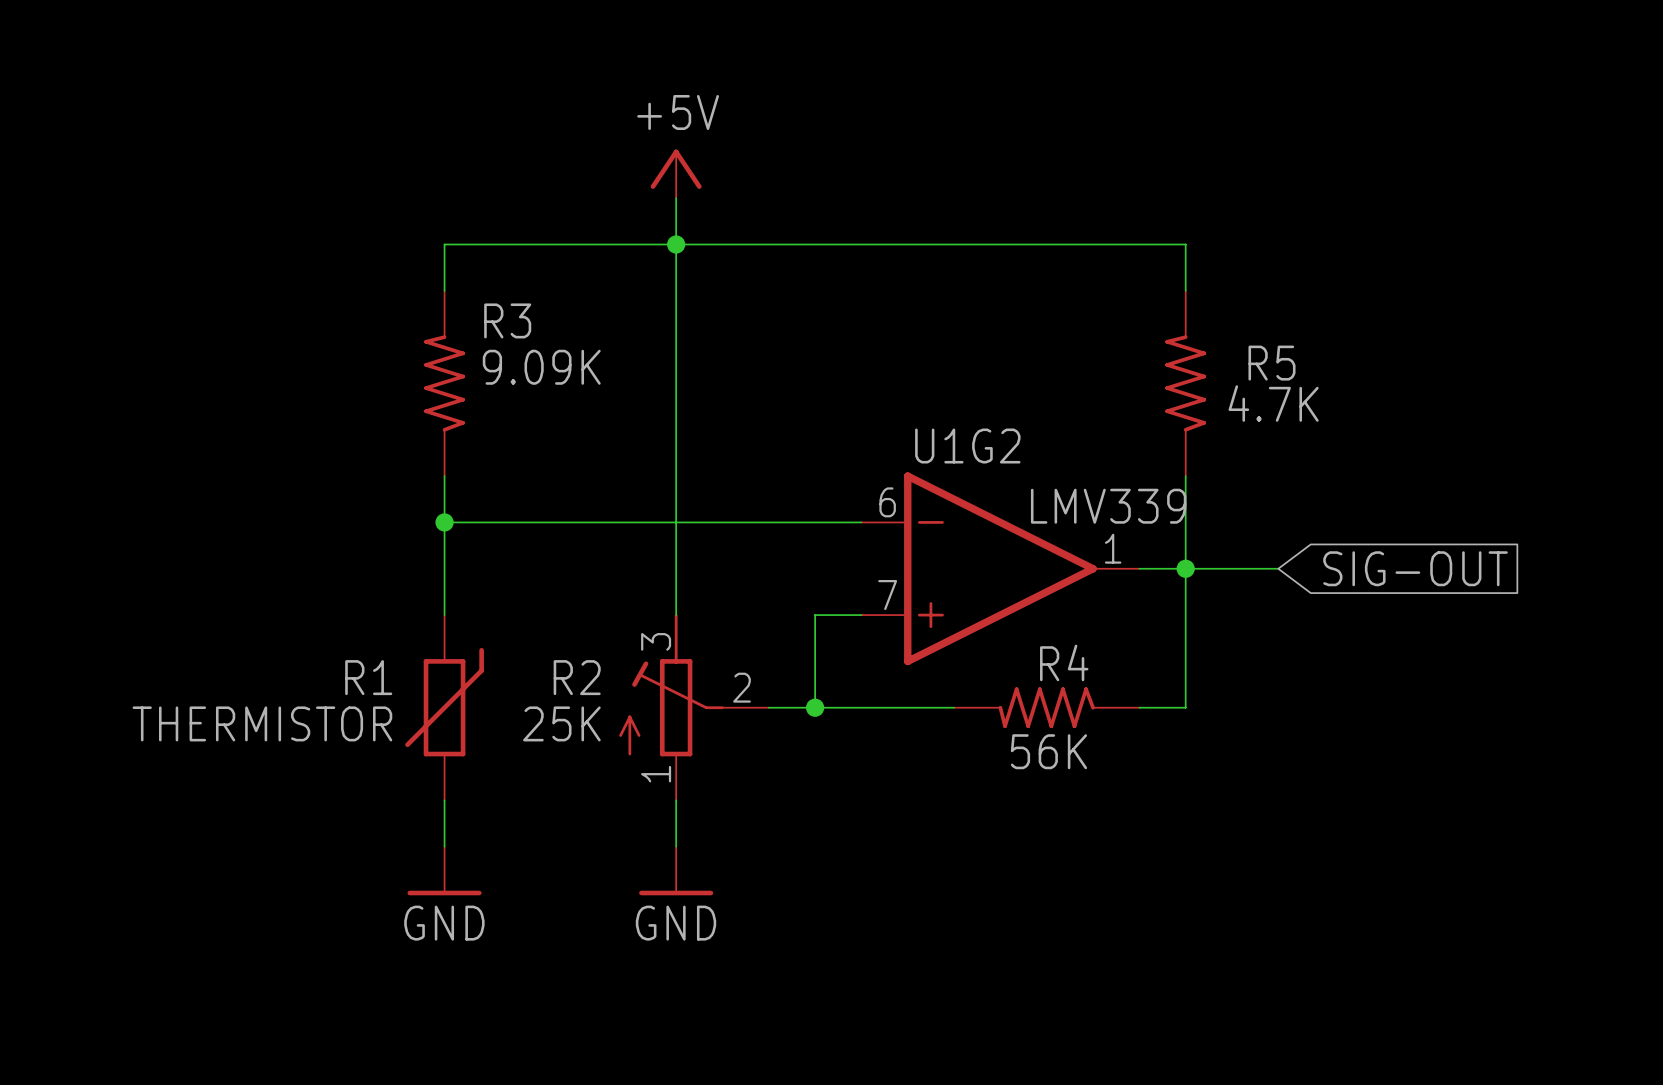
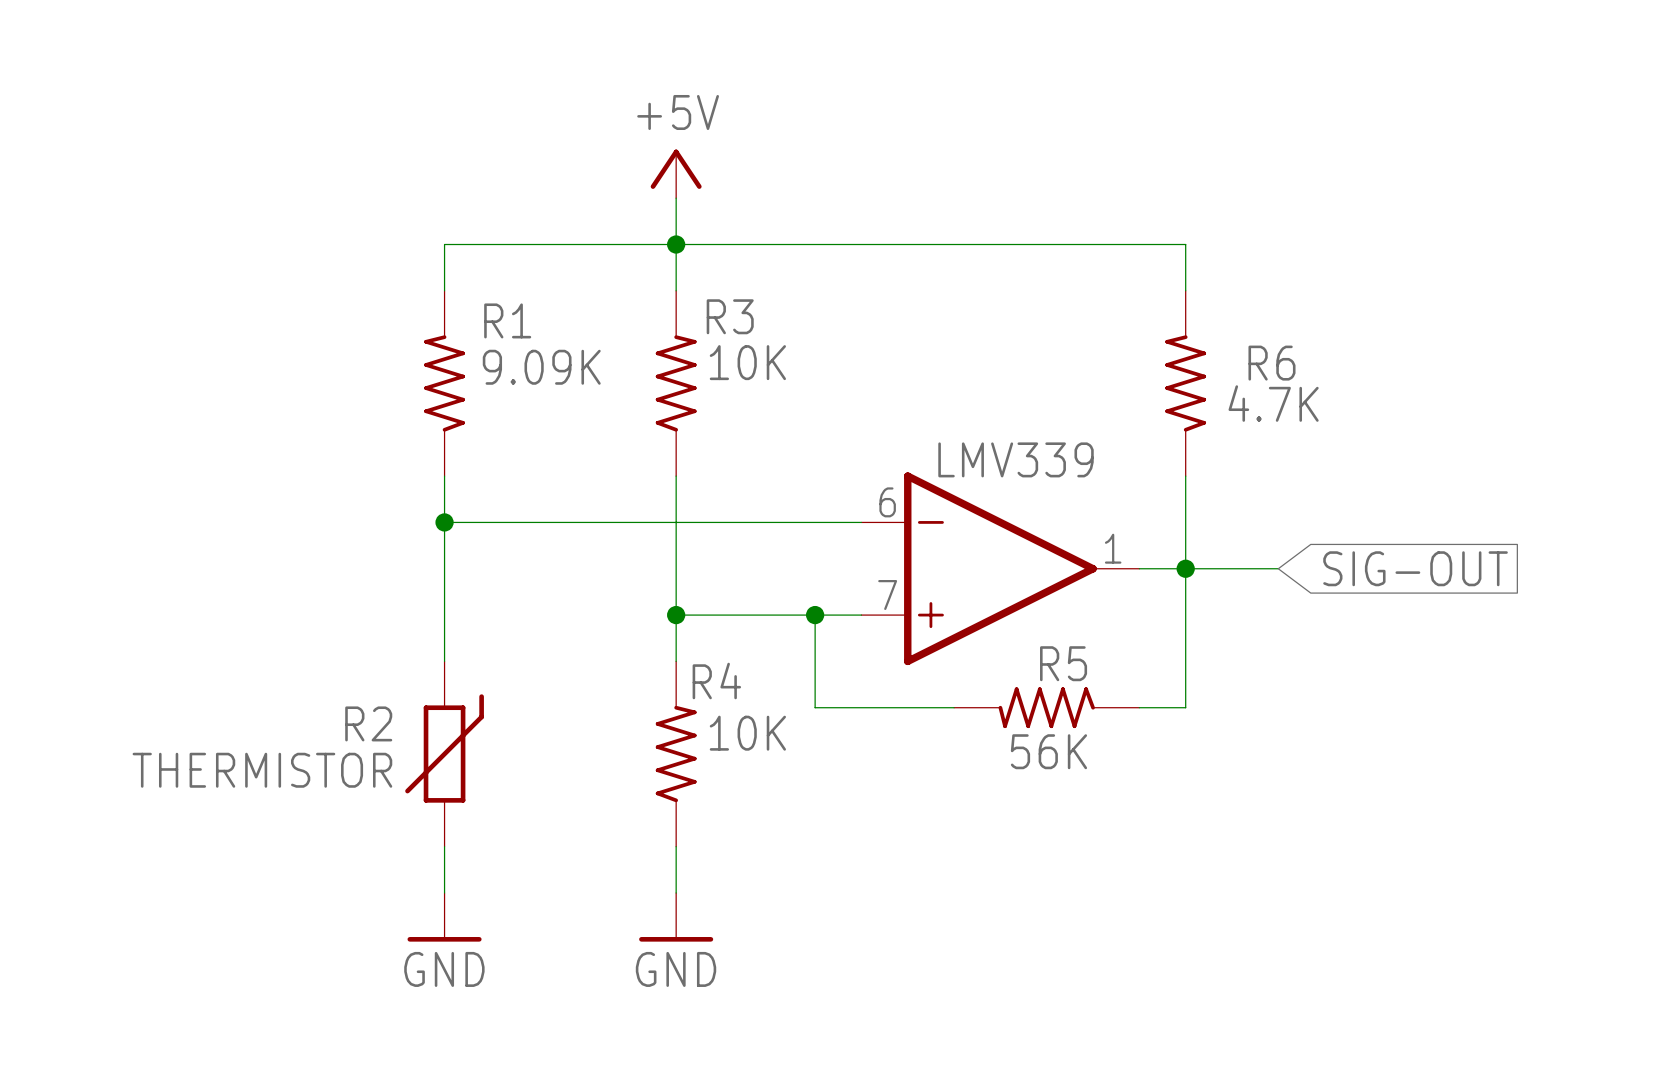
R3 name: R3 (507, 320) -> R1 (507, 320)
R5 name: R5 (1271, 363) -> R6 (1271, 363)
R3: none -> 10K (676, 383)
U1G2 name: U1G2 (967, 446) -> none
U1G2 value position: LMV339 (1108, 506) -> LMV339 (1016, 459)
R2 symbol: [619, 613, 769, 801] -> [405, 661, 484, 847]
junction: none -> (676, 615)
wire: none -> (815, 615) (676, 615) (676, 661)
junction: none -> (815, 615)
R4 name: R4 (1064, 662) -> R5 (1063, 663)
R2 name position: R2 (577, 677) -> R2 (368, 723)
R1: THERMISTOR (444, 707) -> none
wire: (768, 707) (815, 707) -> none
junction: (815, 707) -> none
R2 value: 25K (561, 723) -> THERMISTOR (262, 770)
R4: none -> 10K (676, 754)
power symbol position: GND (444, 871) -> GND (444, 917)
power symbol position: GND (676, 871) -> GND (676, 917)

